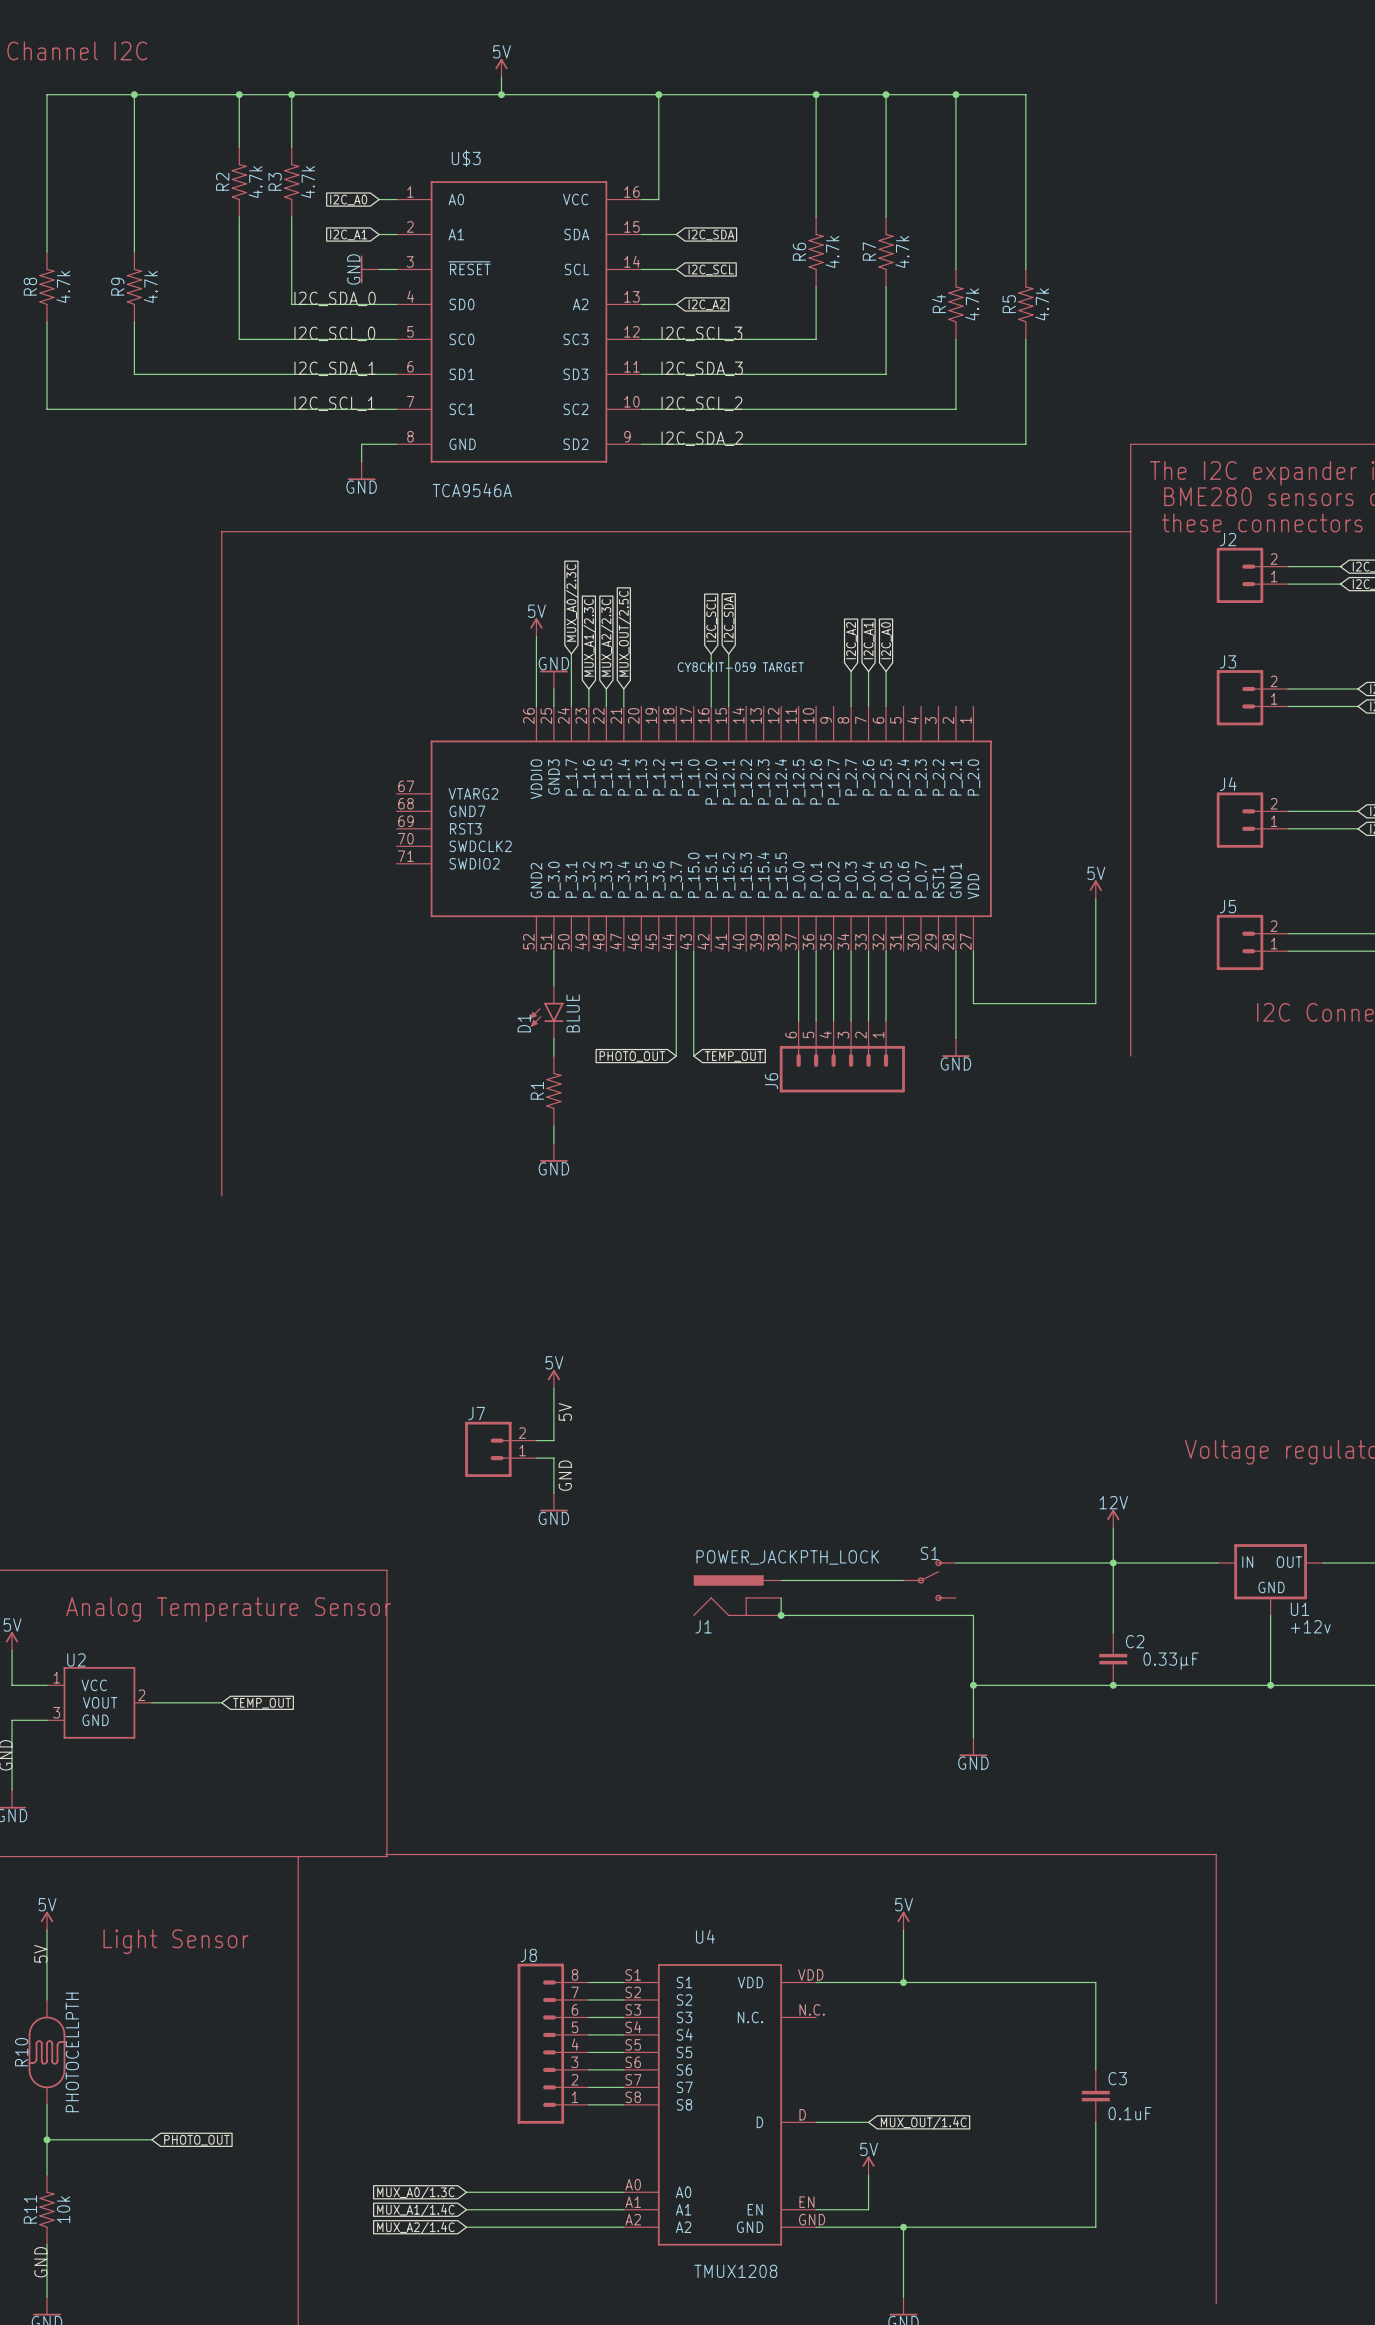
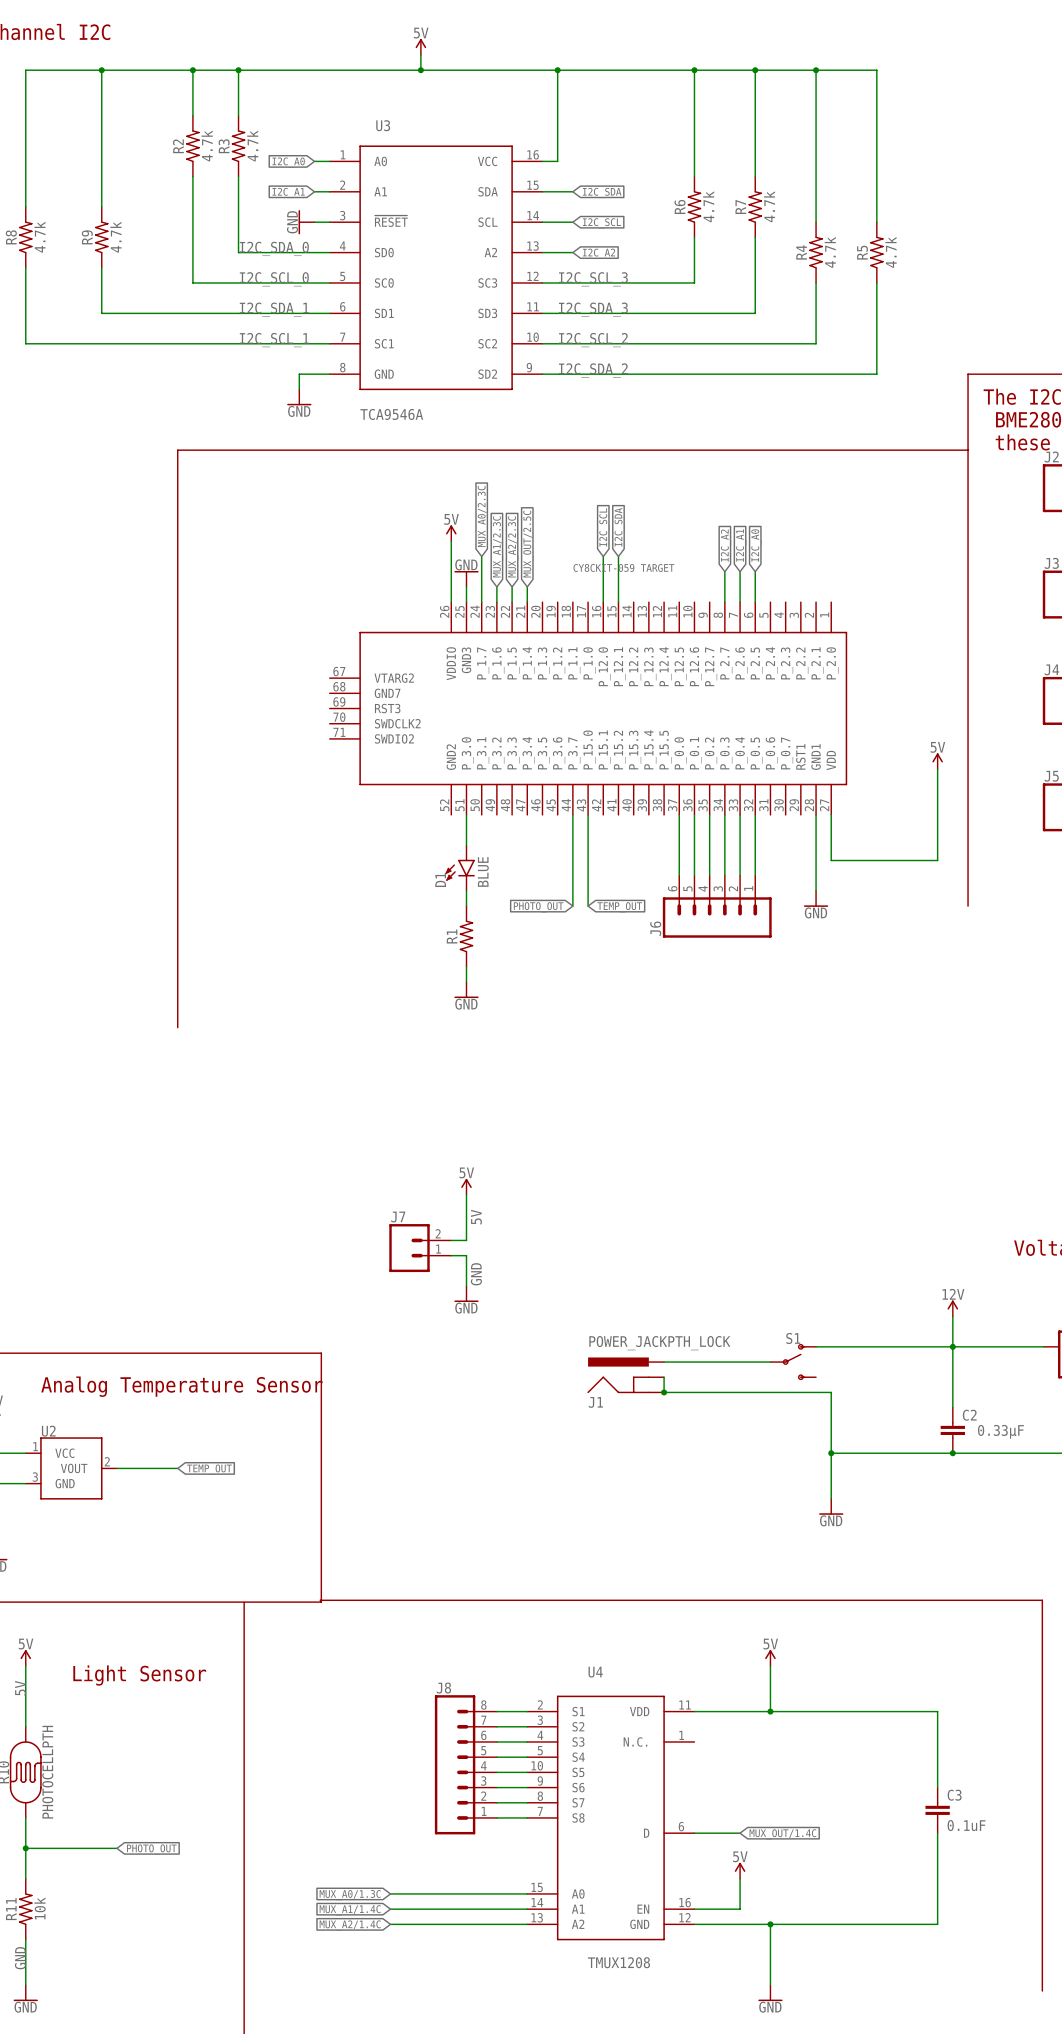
U$3 name: U$3 (466, 158) -> U3 (383, 125)
U4 symbol: [623, 1964, 817, 2246] -> [527, 1695, 695, 1941]

